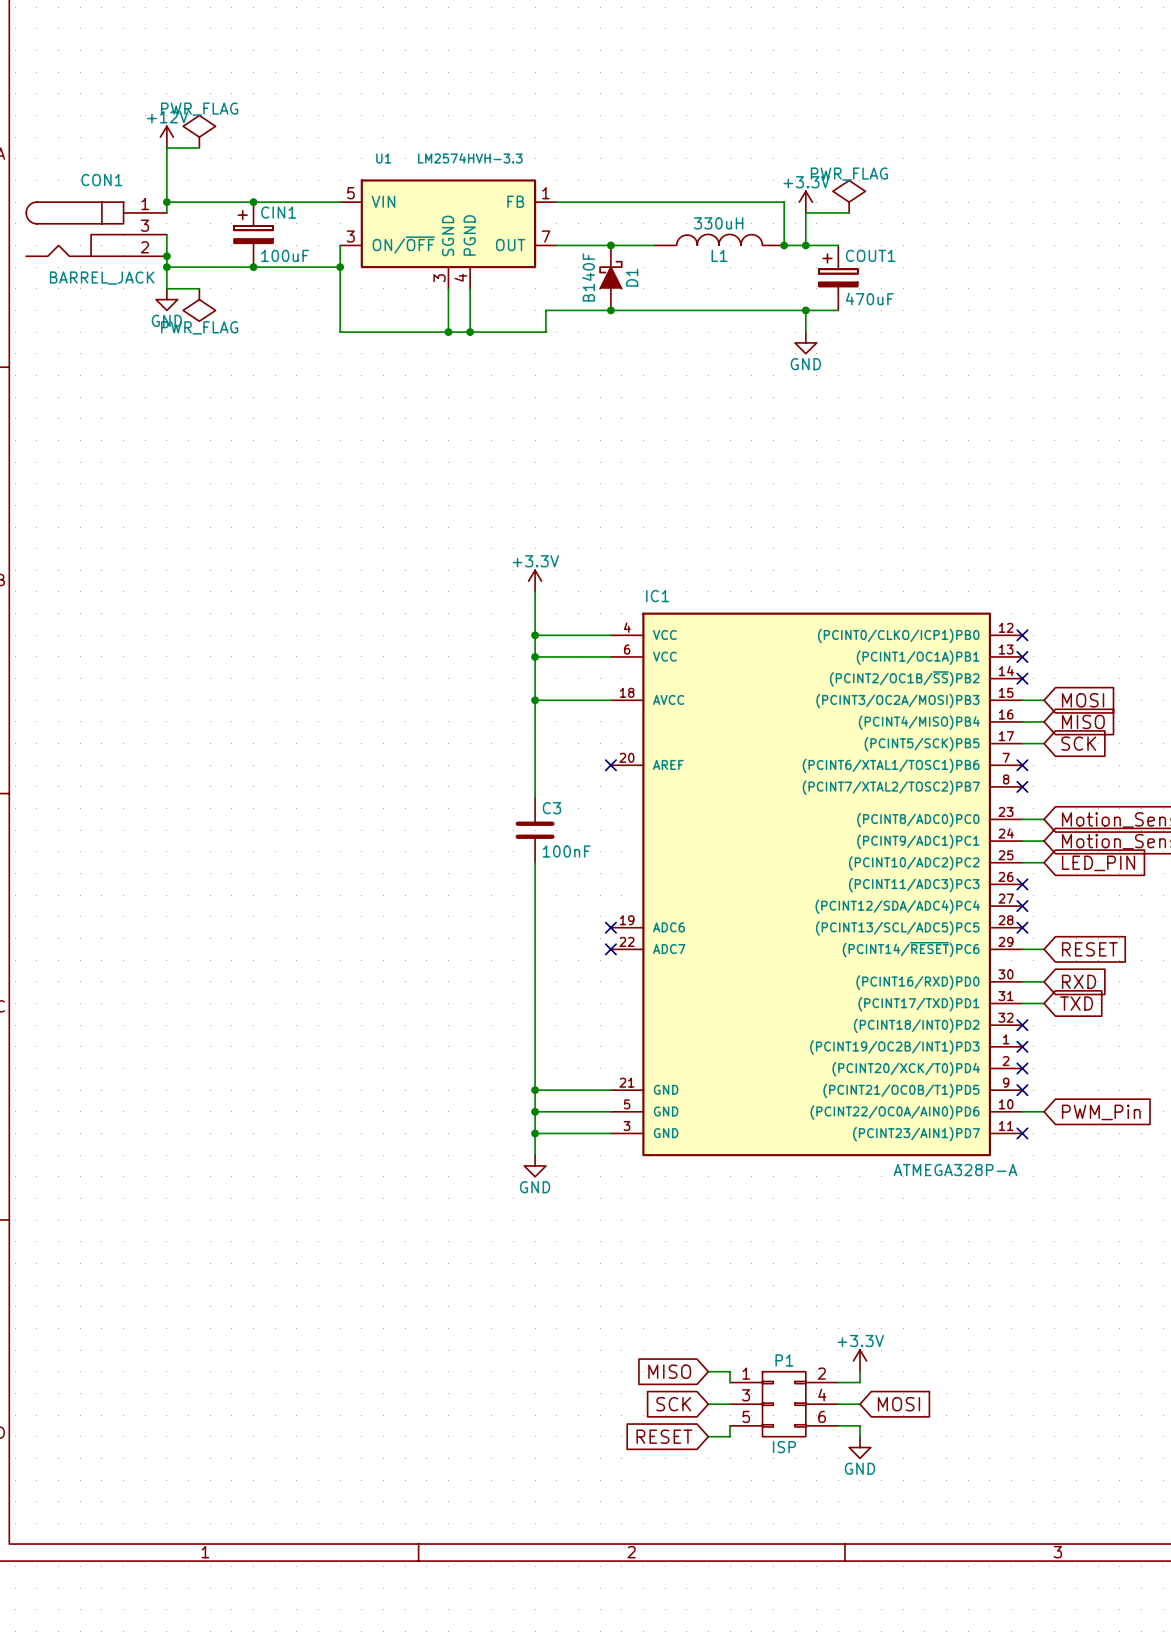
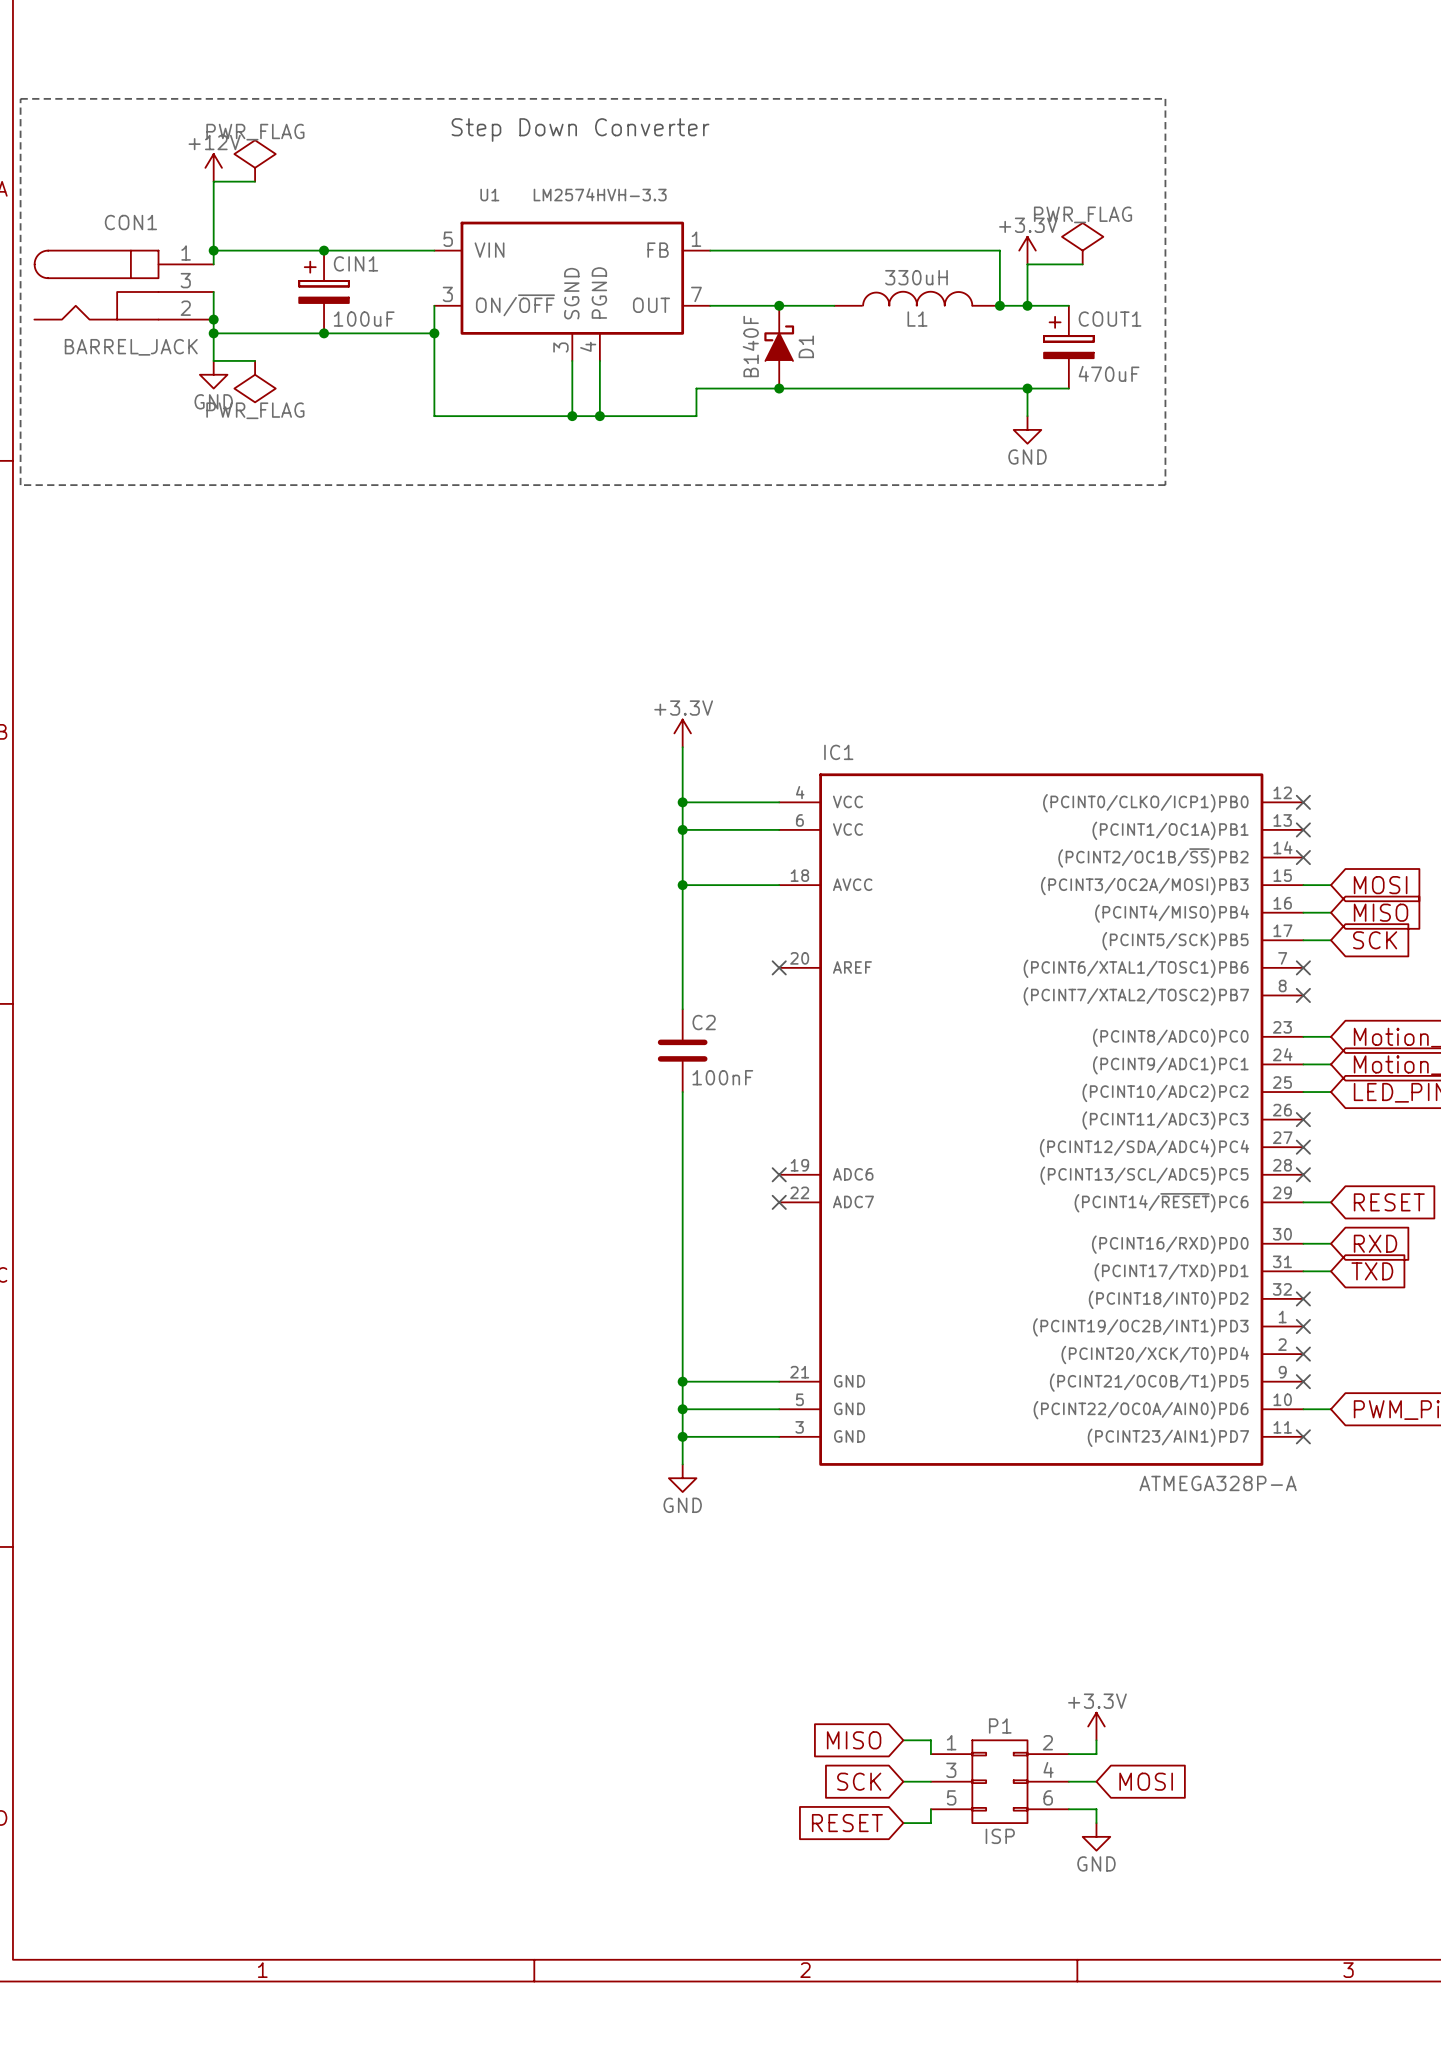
line: none -> (20, 98) (20, 485) (1165, 485) (1165, 98) (20, 98)
text: none -> Step Down Converter (580, 130)
C3 name: C3 (551, 808) -> C2 (704, 1022)

